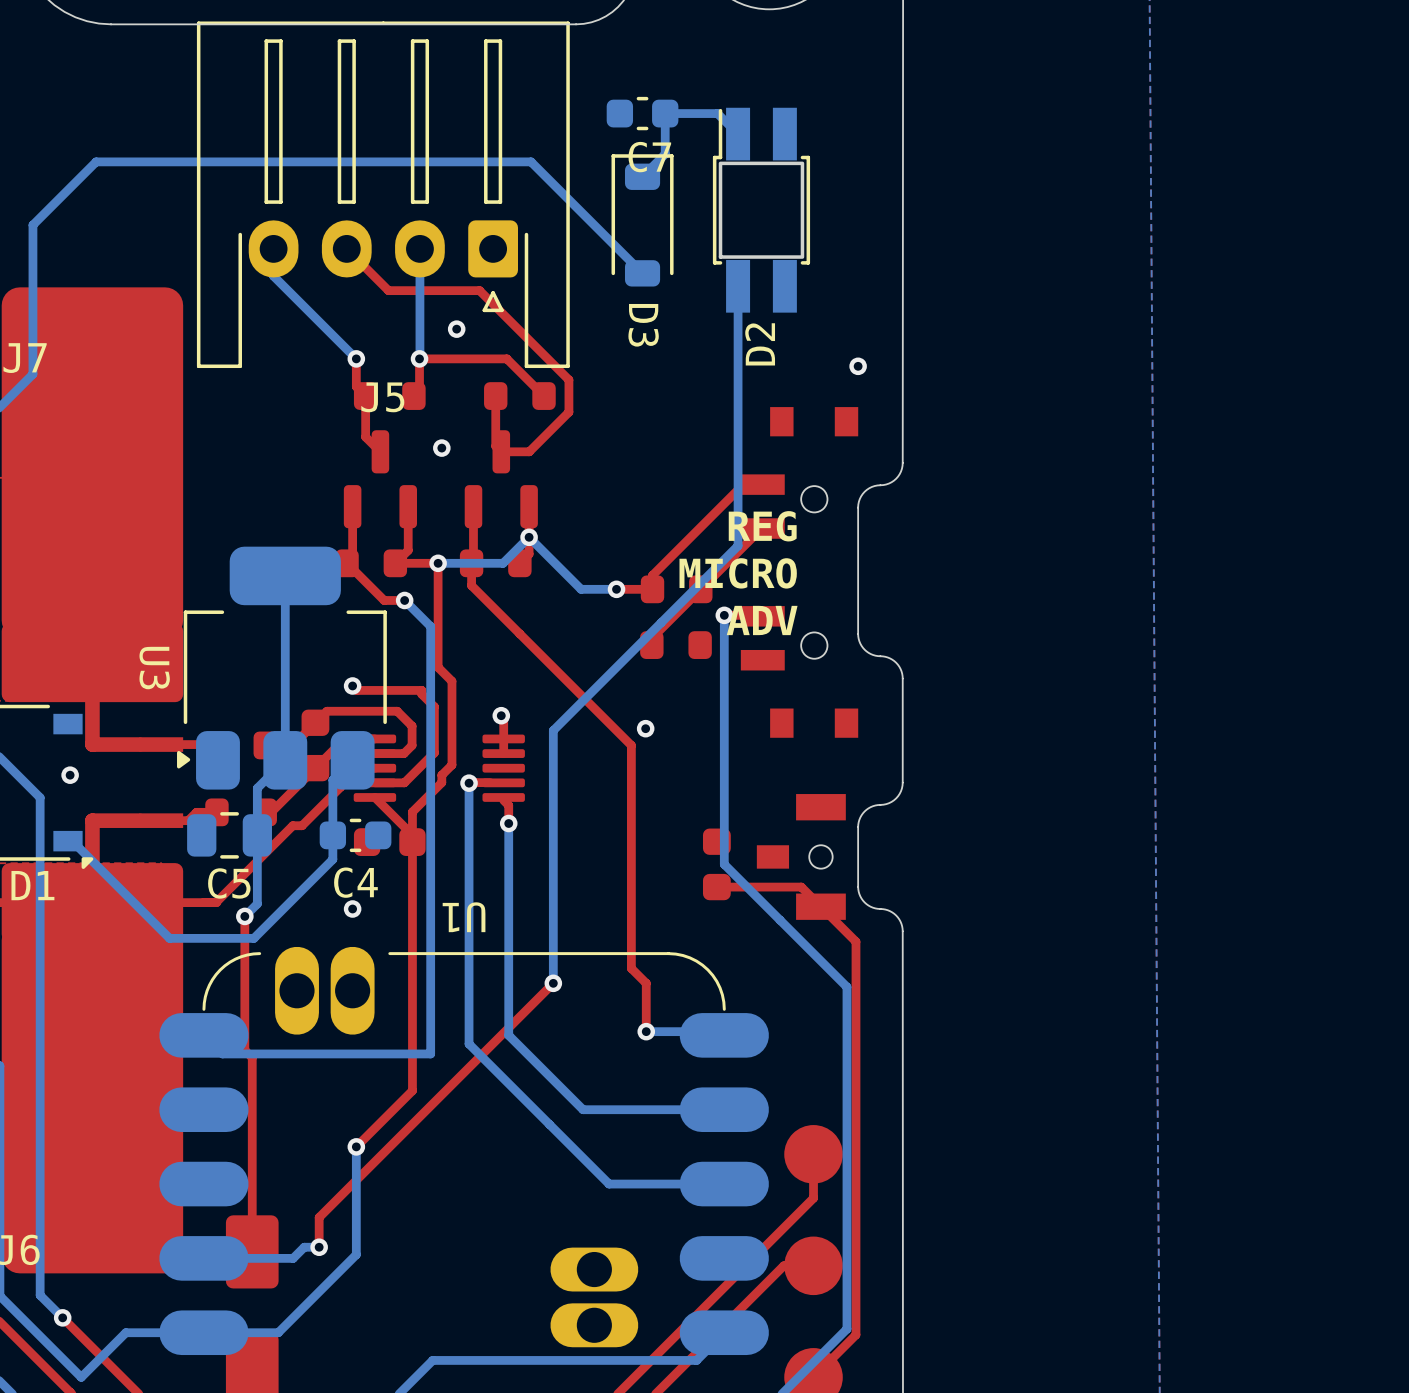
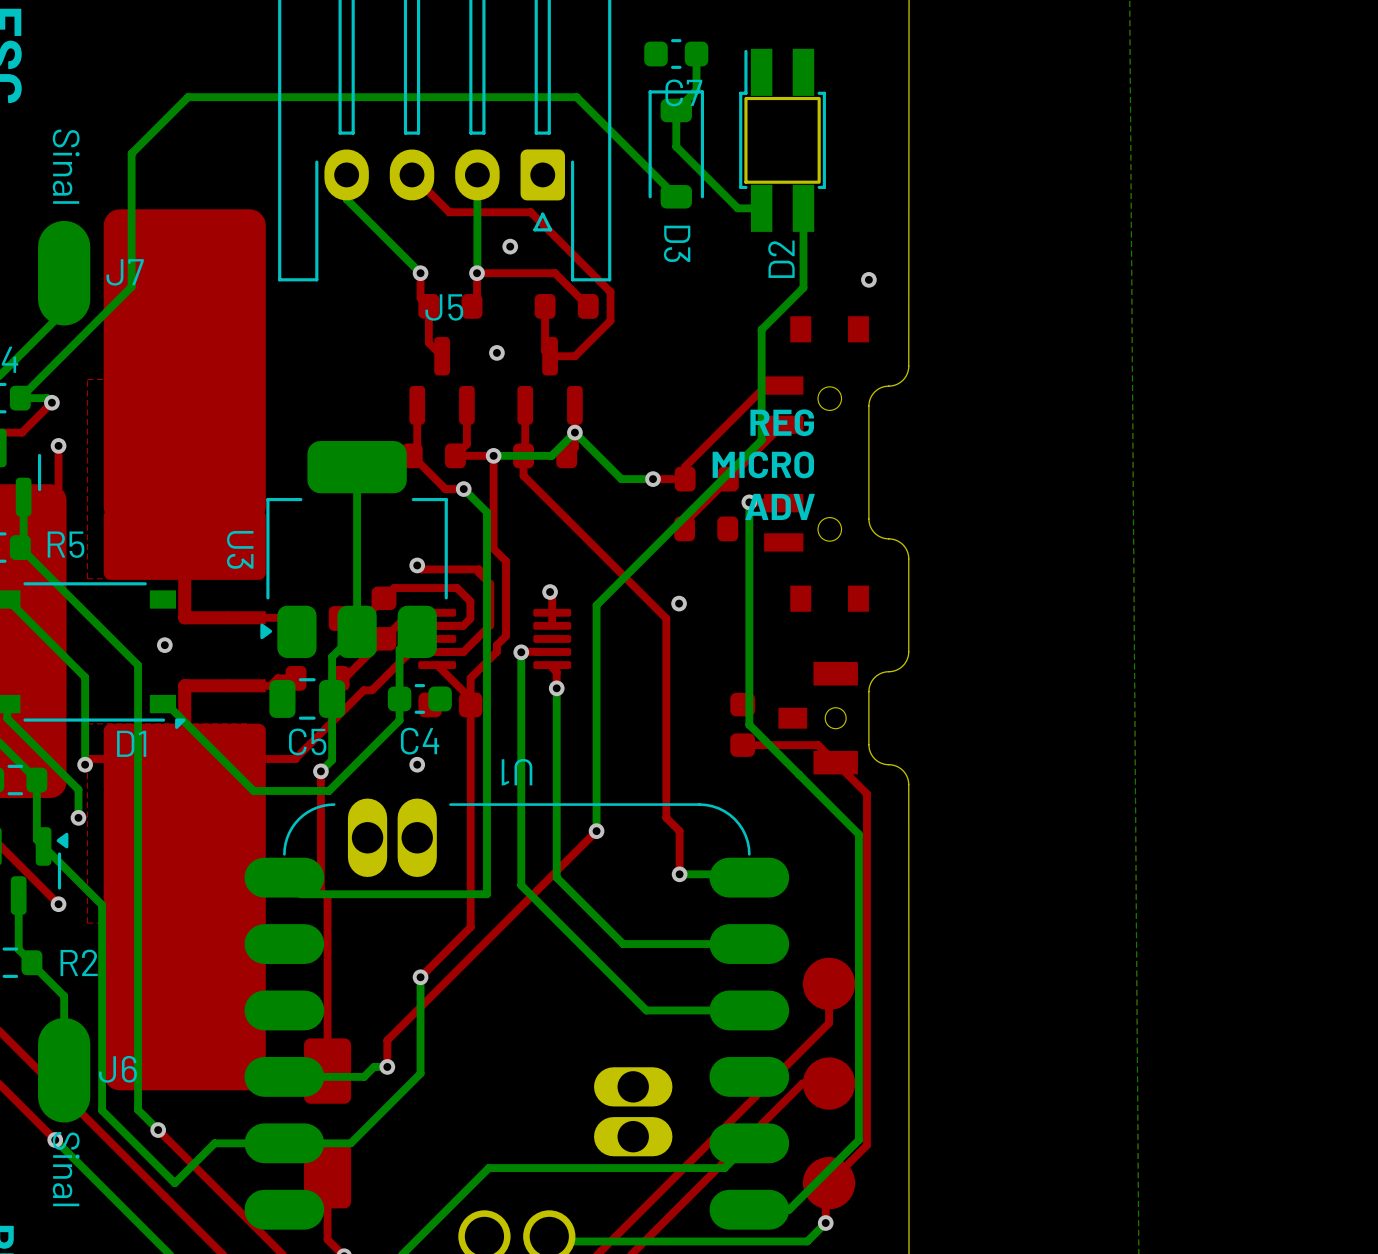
bottom track: (665, 113) (717, 113) (738, 134) -> none
bottom track: none -> (676, 110) (676, 146) (737, 208) (761, 208)
bottom track: (738, 286) (738, 422) -> (803, 208) (803, 287) (761, 329)

